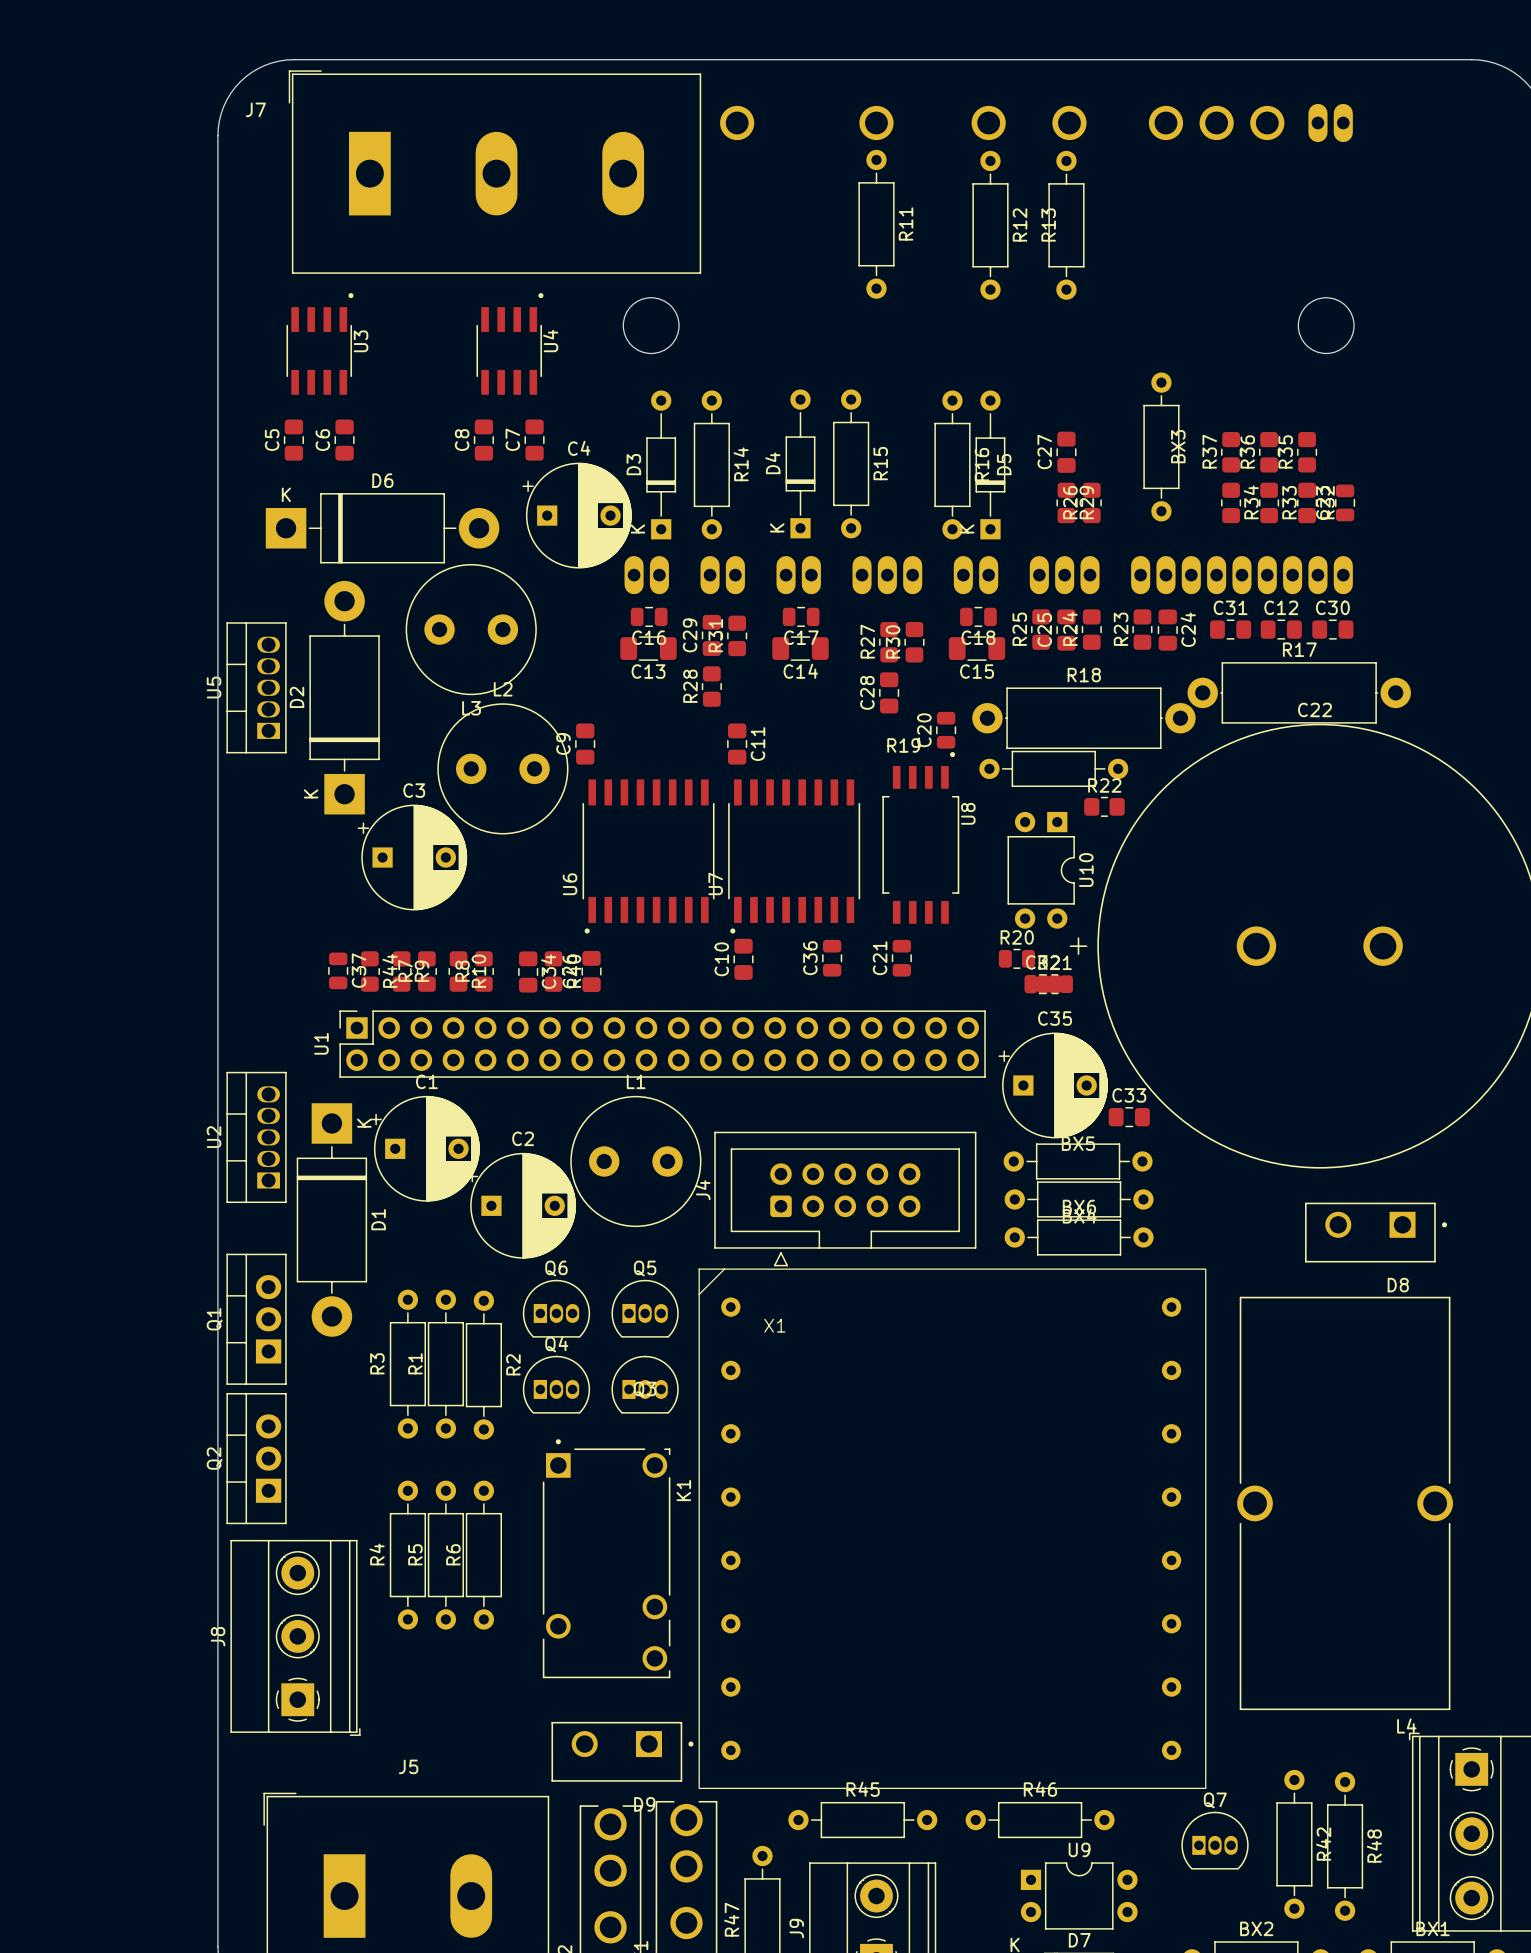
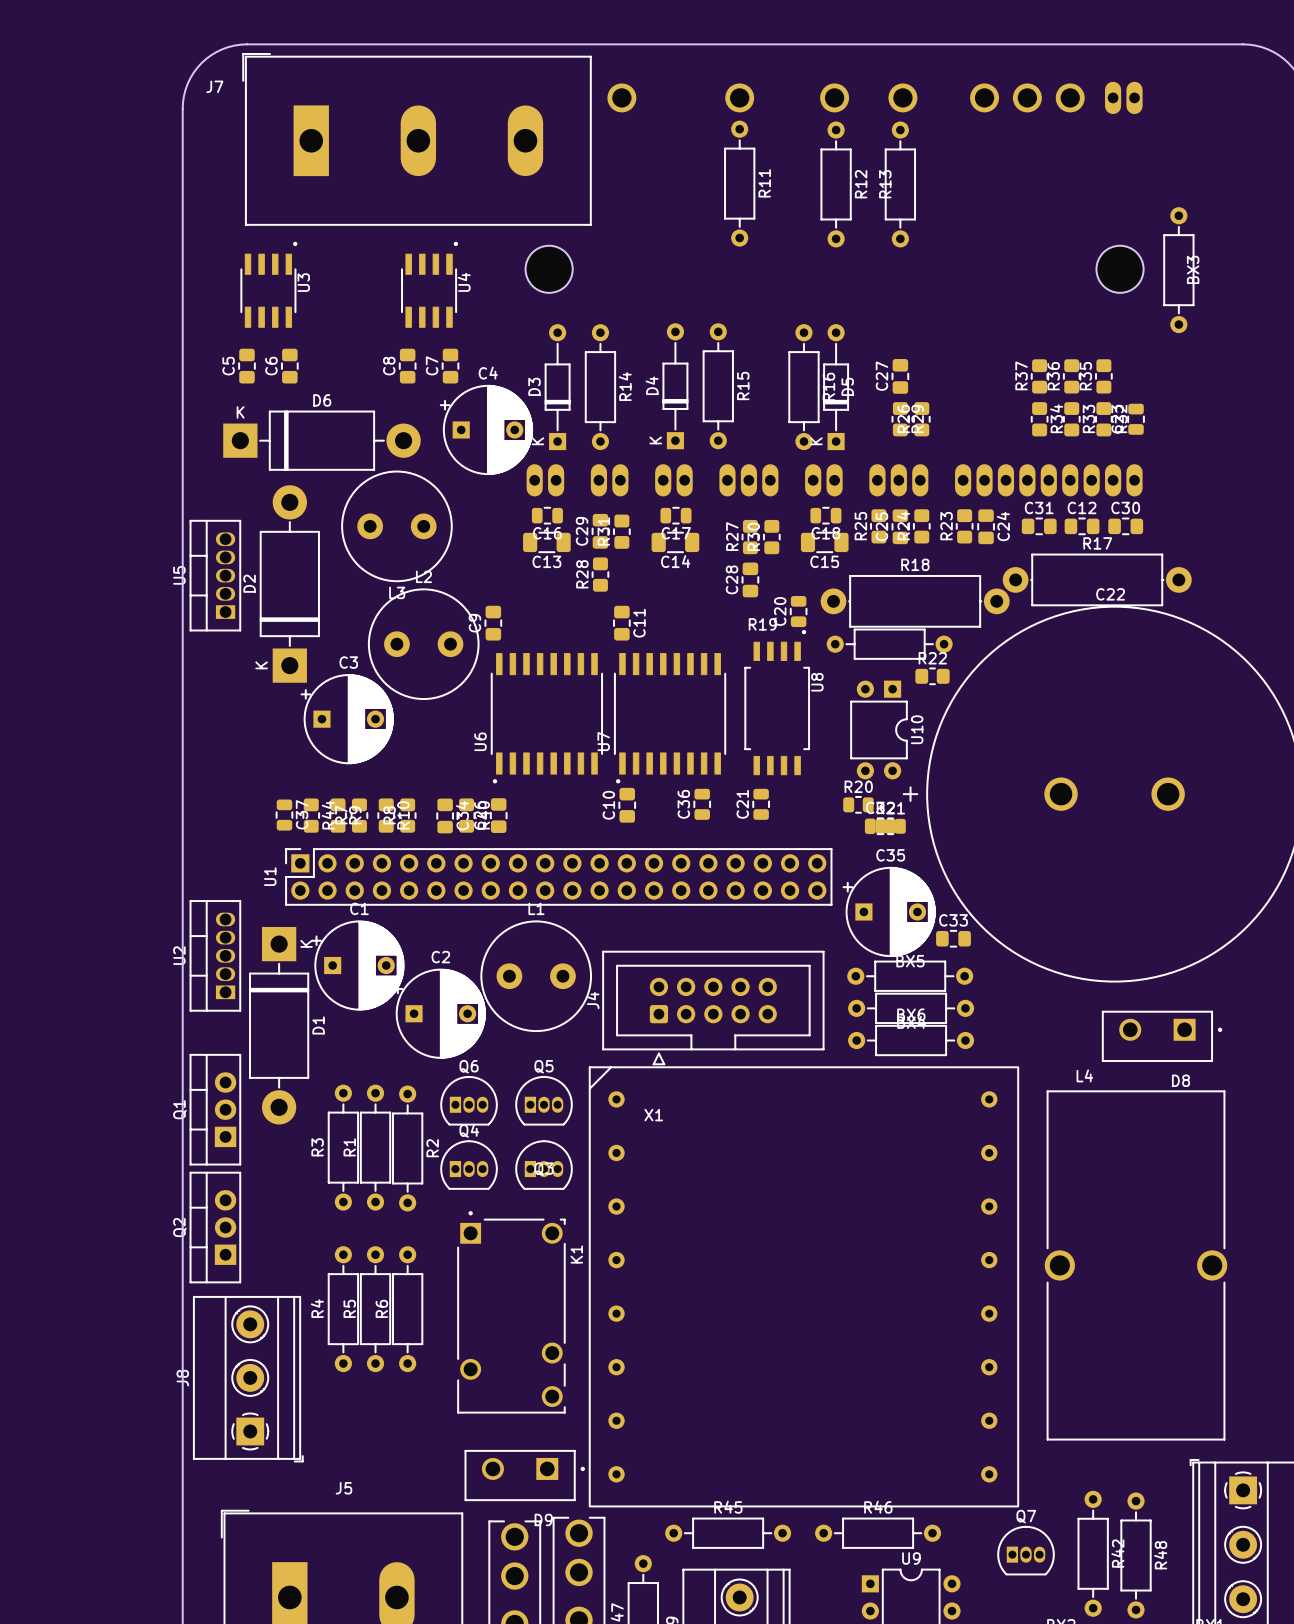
BX3 position: (1161, 446) -> (1178, 270)
L4 name position: L4 (1406, 1725) -> L4 (1084, 1075)

